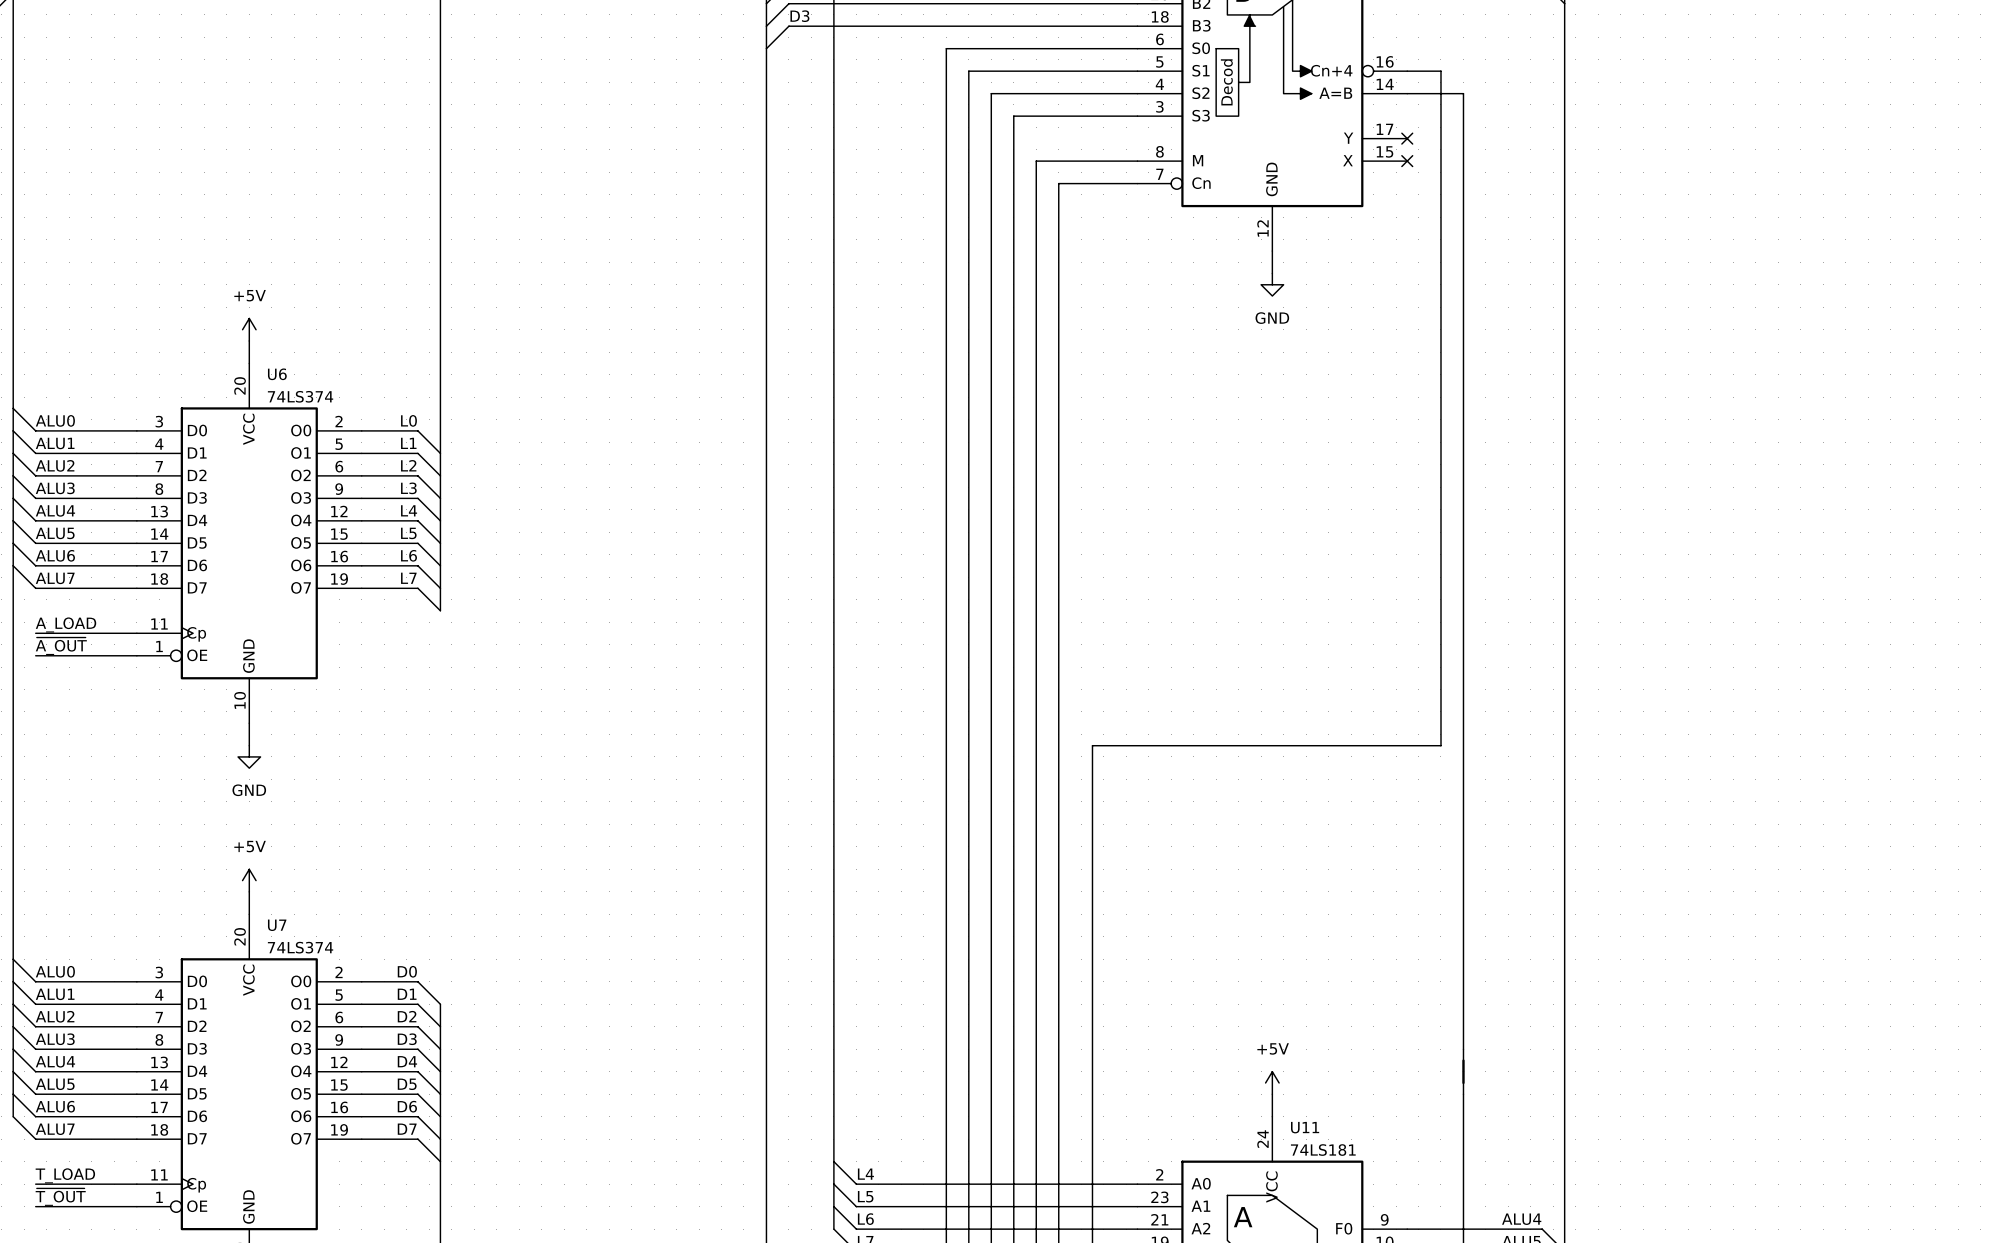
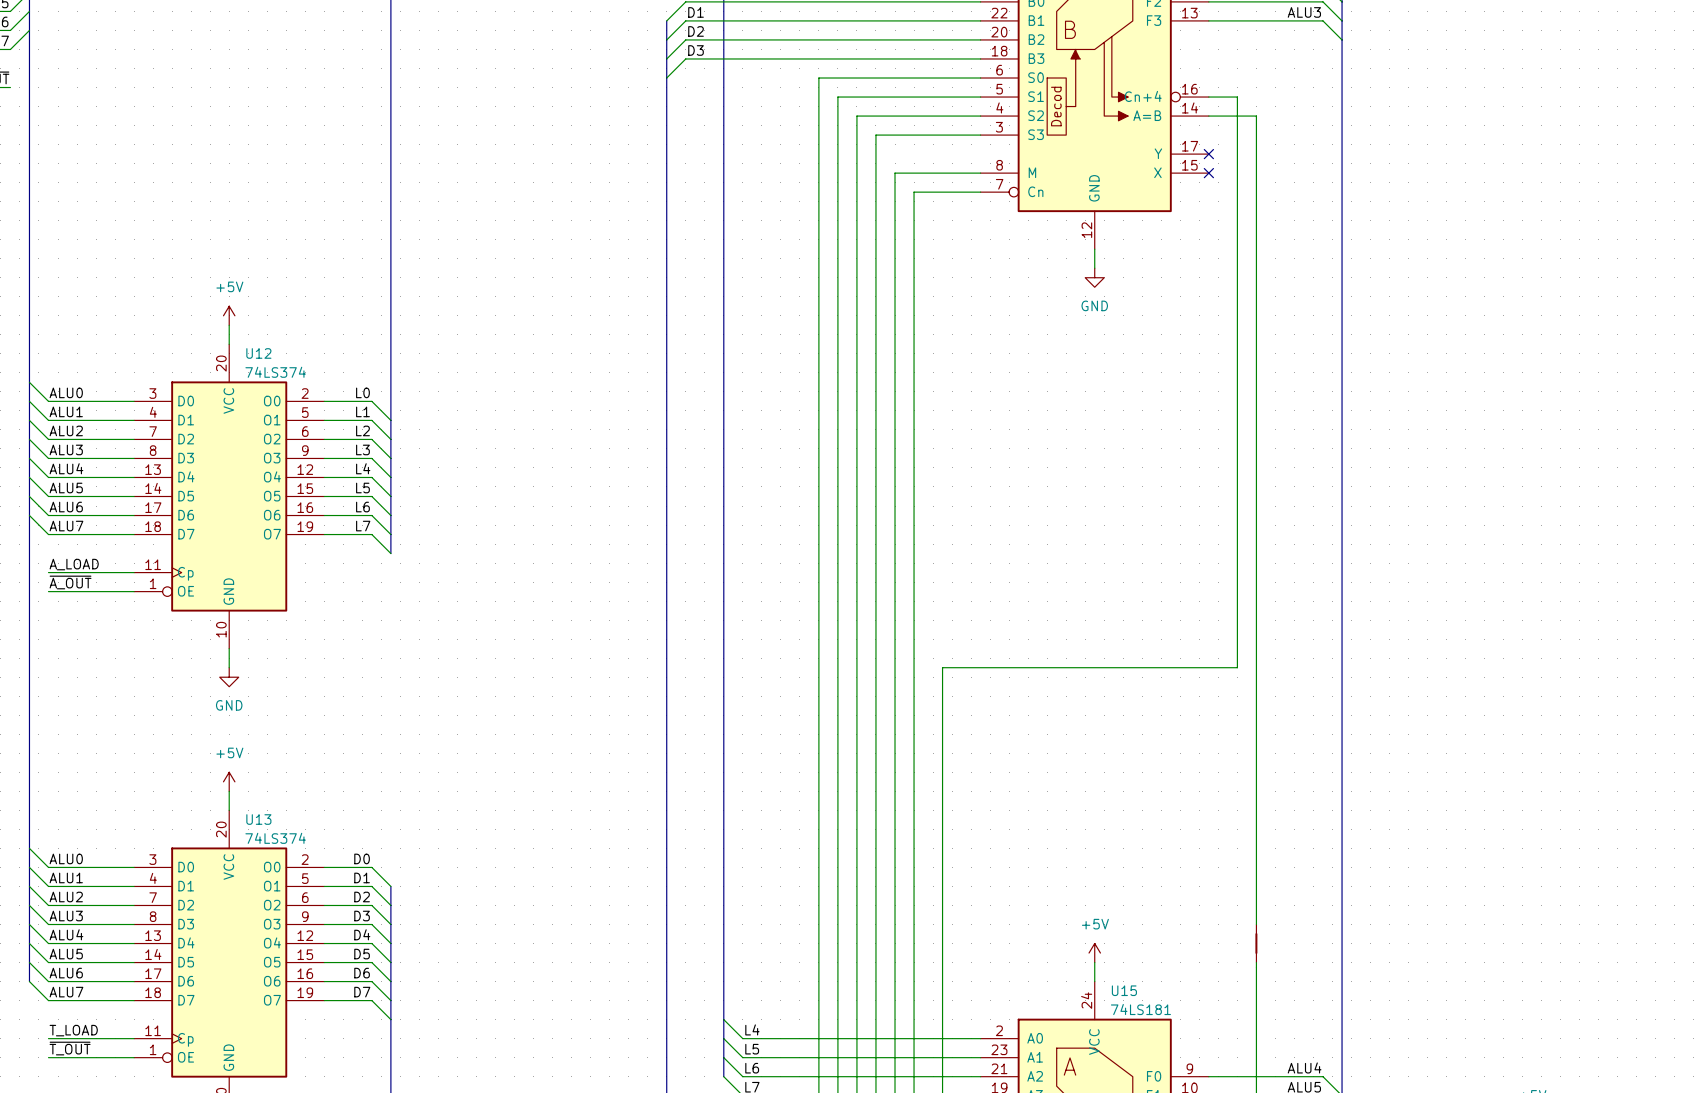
U6 name: U6 (277, 374) -> U12 (258, 353)
U7 name: U7 (277, 925) -> U13 (258, 819)
U11 name: U11 (1305, 1127) -> U15 (1124, 990)

